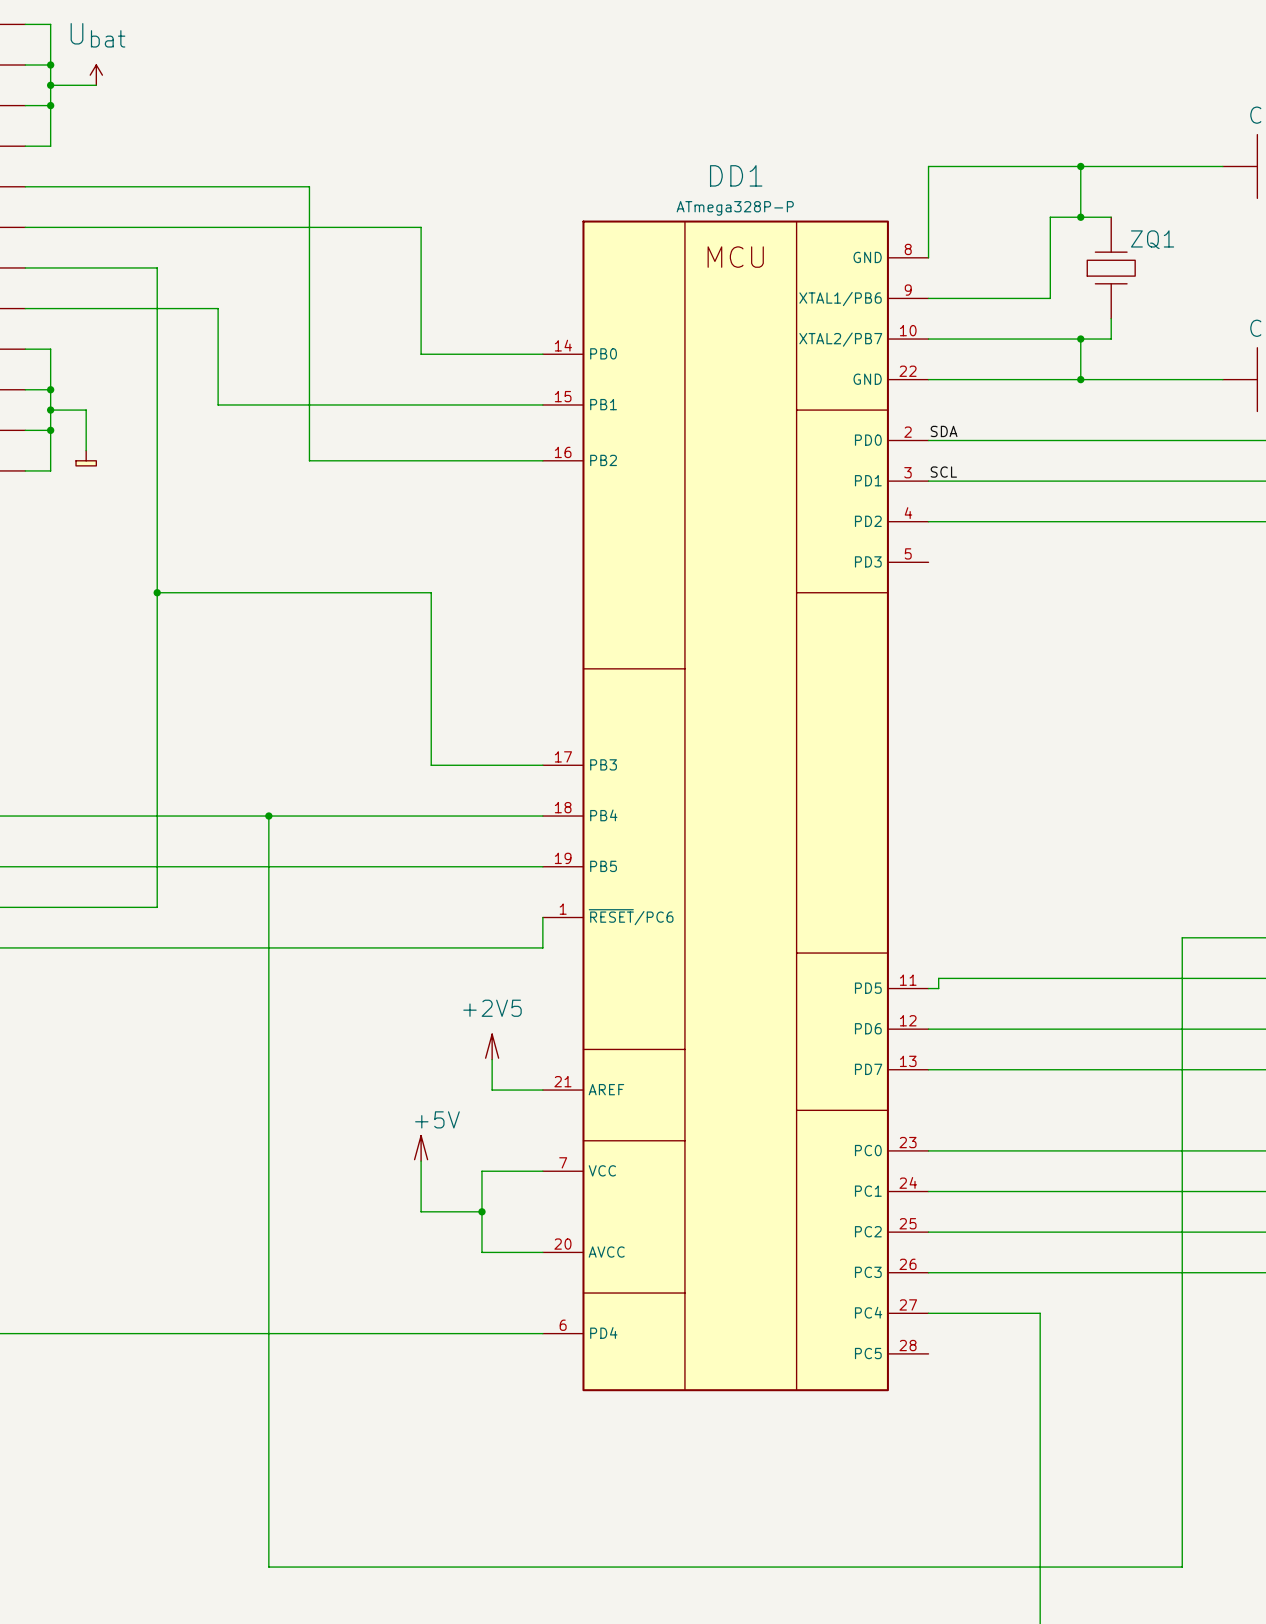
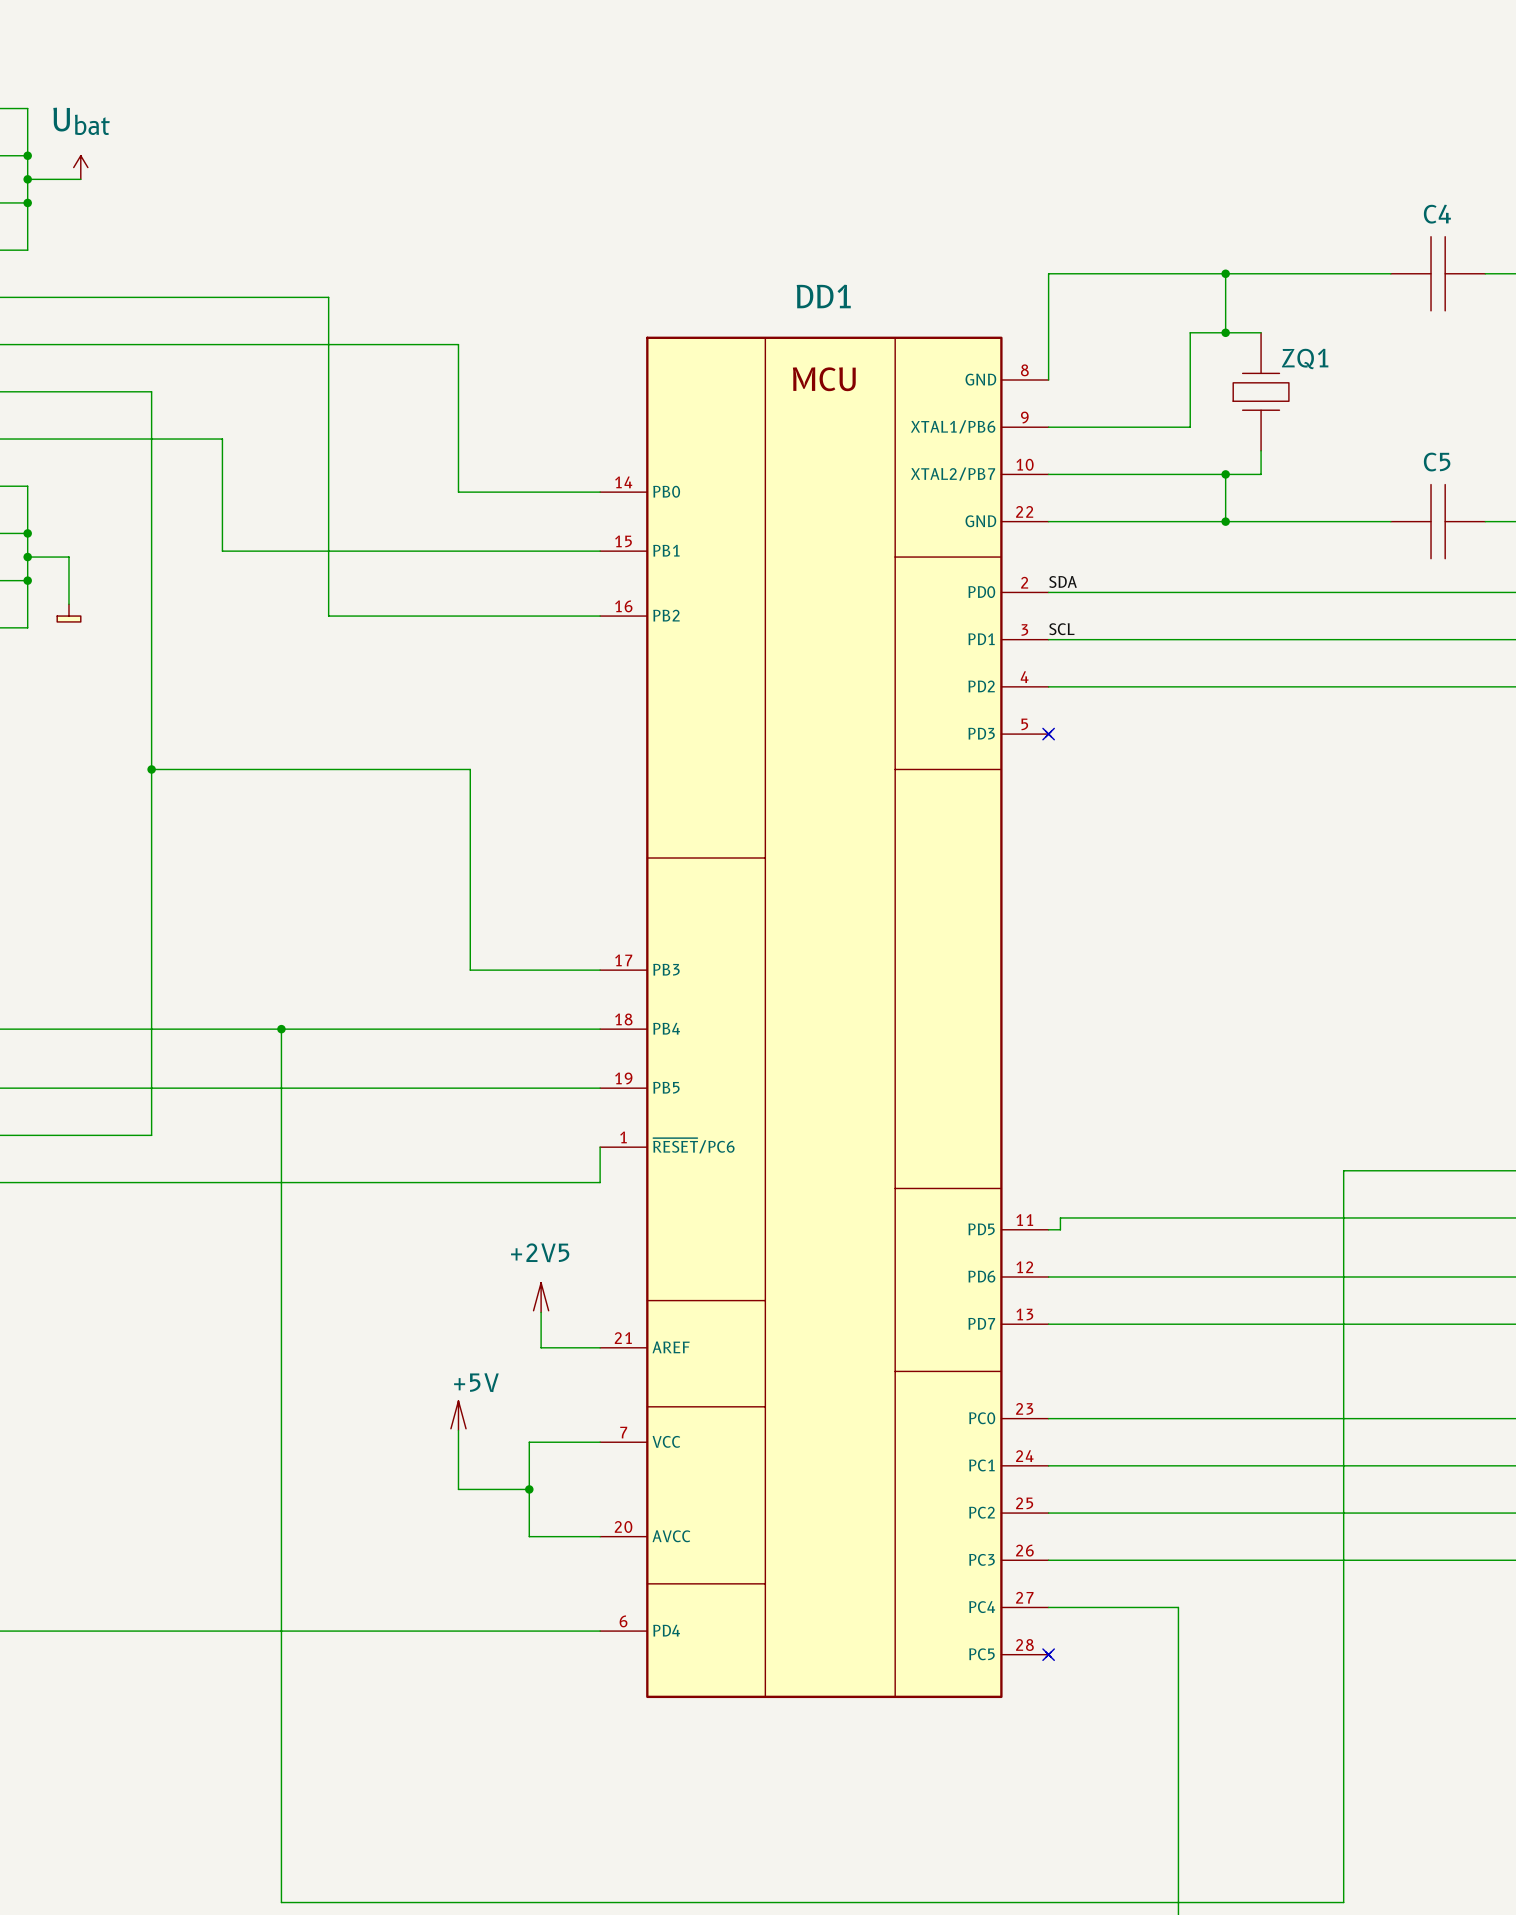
DD1 value: ATmega328P-P (735, 208) -> none
DD1 symbol: [542, 220, 929, 1392] -> [600, 336, 1052, 1699]
no-connect mark: none -> (1048, 734)
no-connect mark: none -> (1048, 1654)

